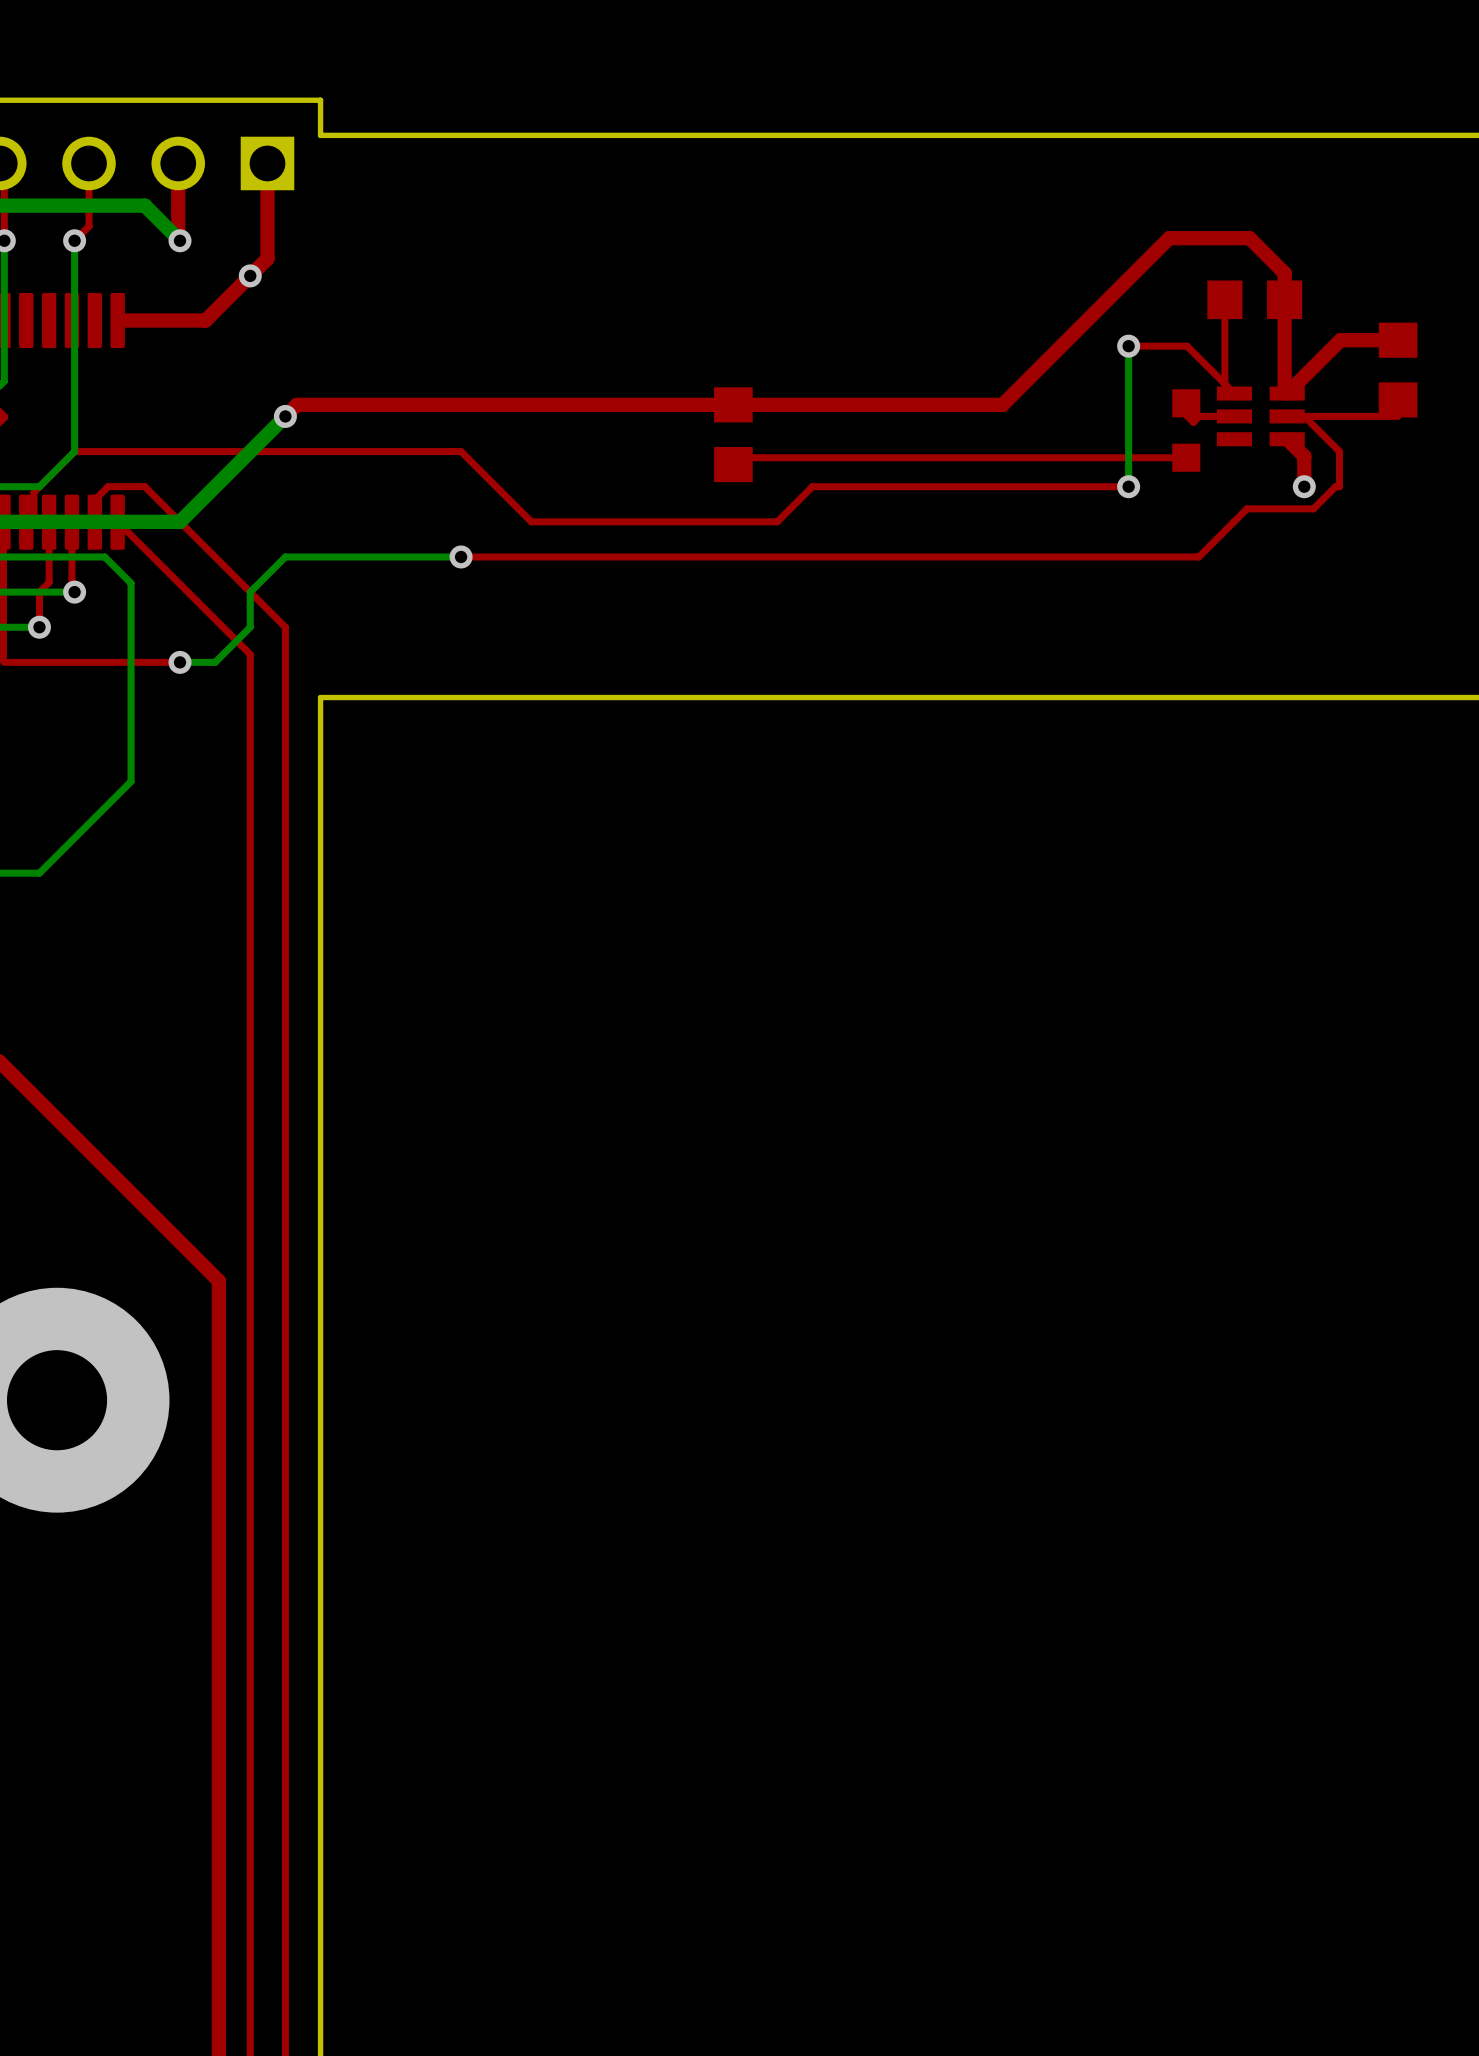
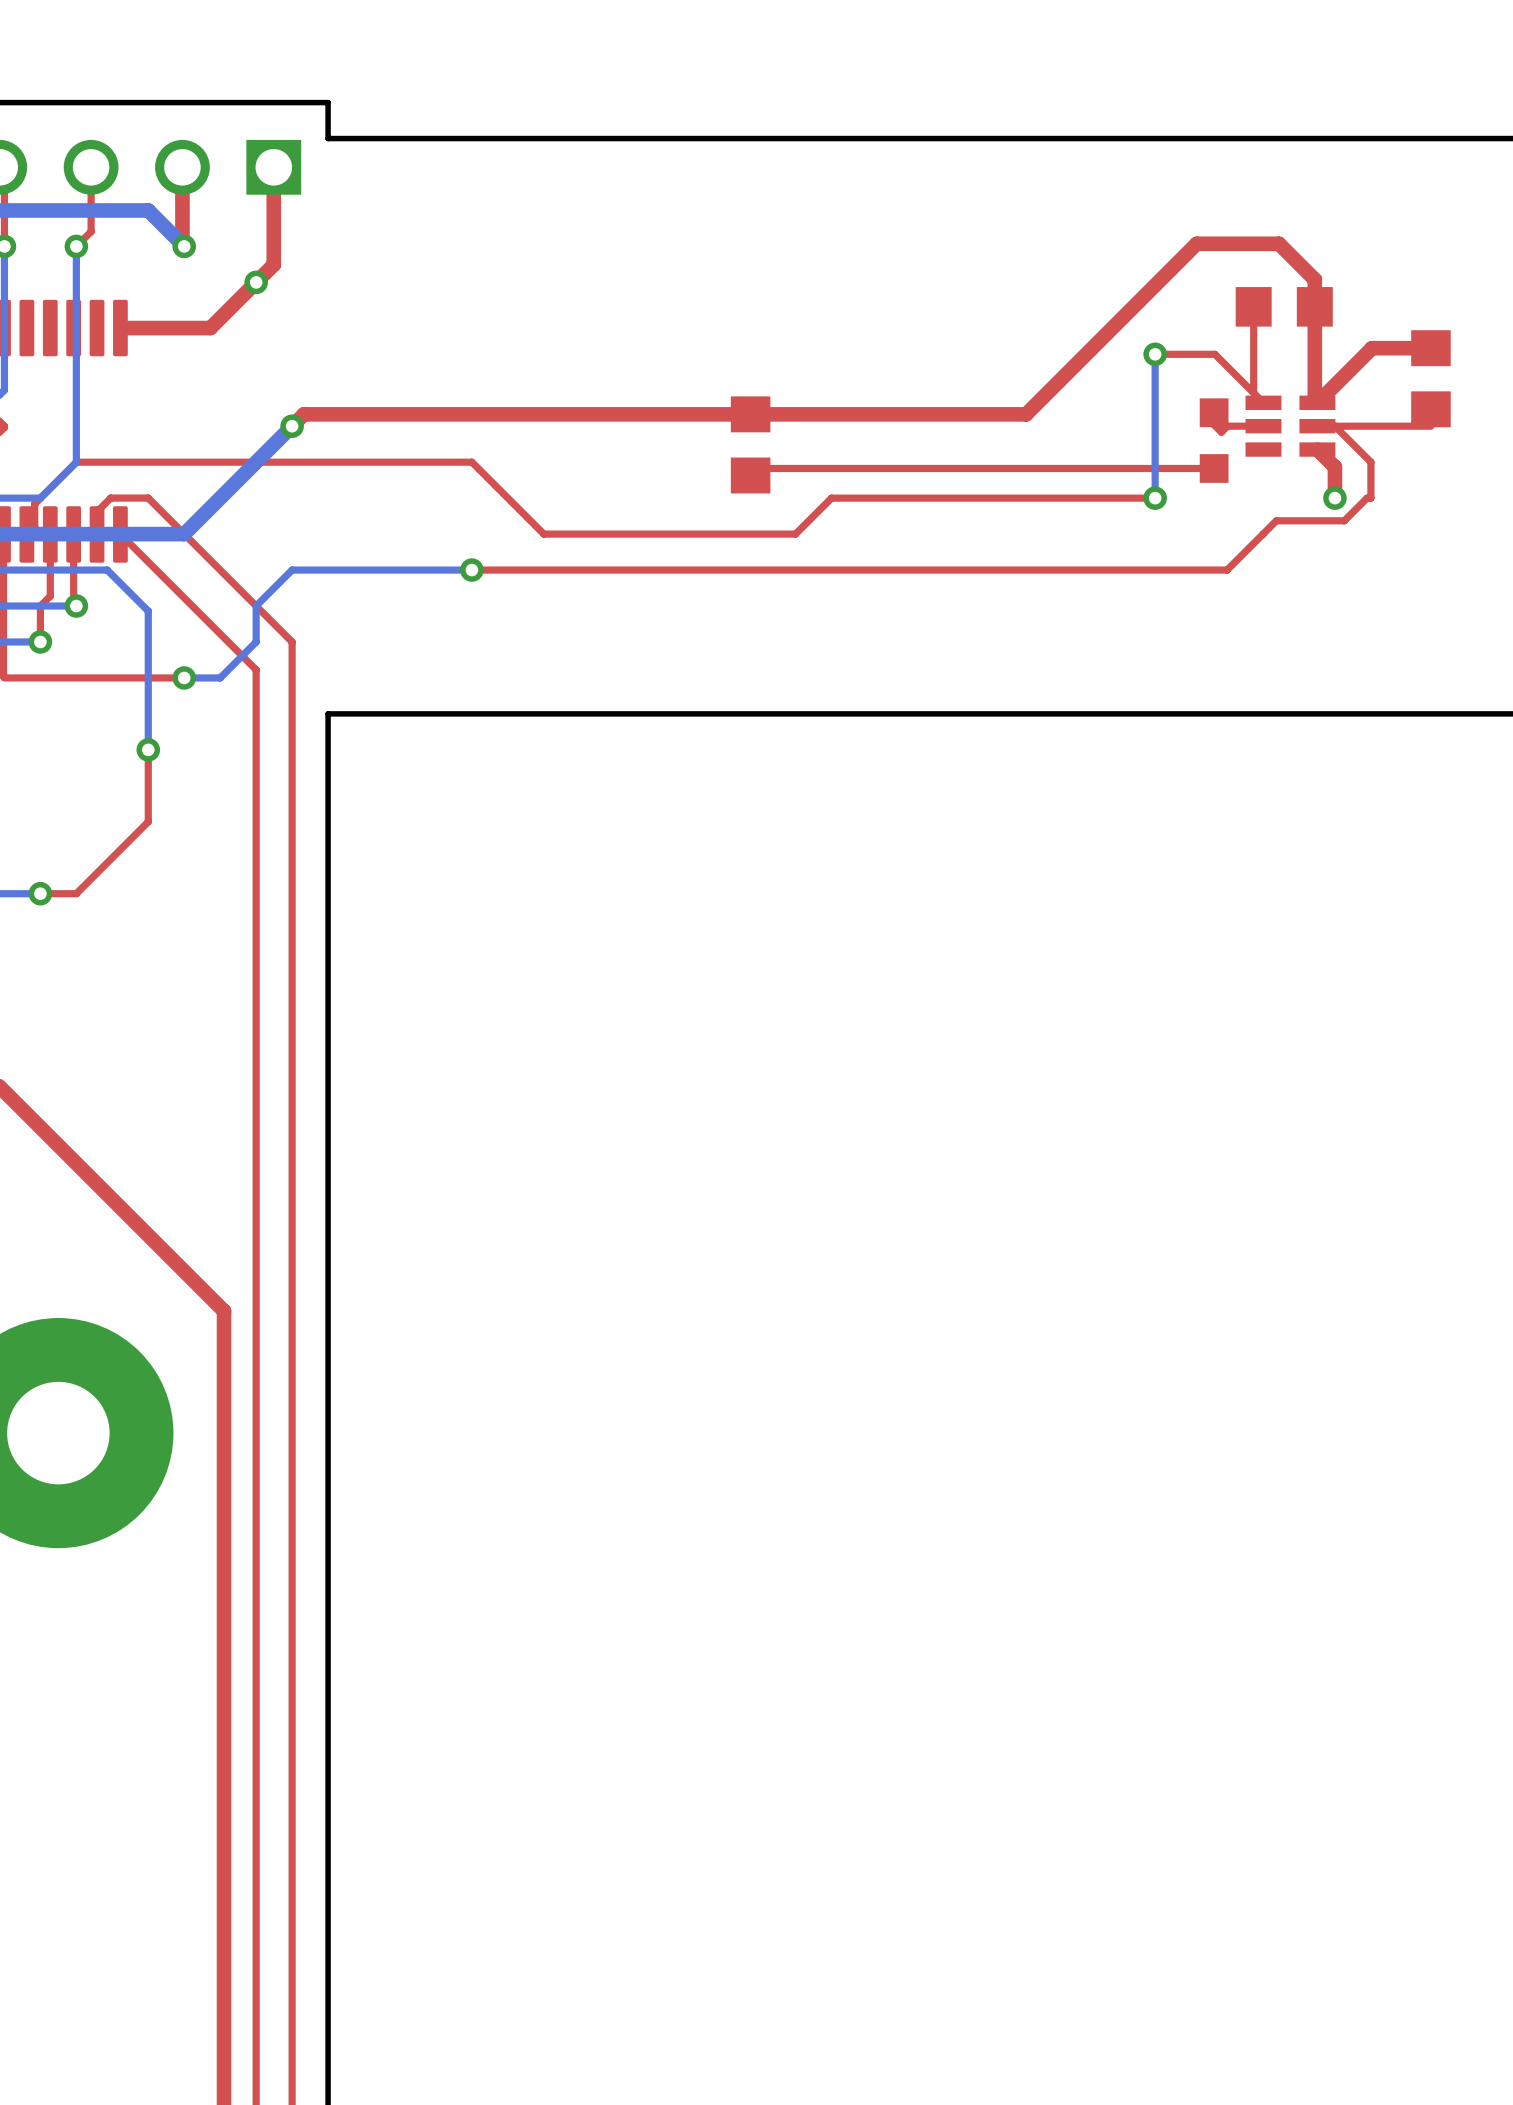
bottom track: (131, 583) (131, 781) (39, 873) -> (134, 596) (148, 611) (148, 749)
top track: none -> (148, 749) (148, 821) (76, 893) (40, 893)
via: none -> (148, 749)
via: none -> (40, 893)

